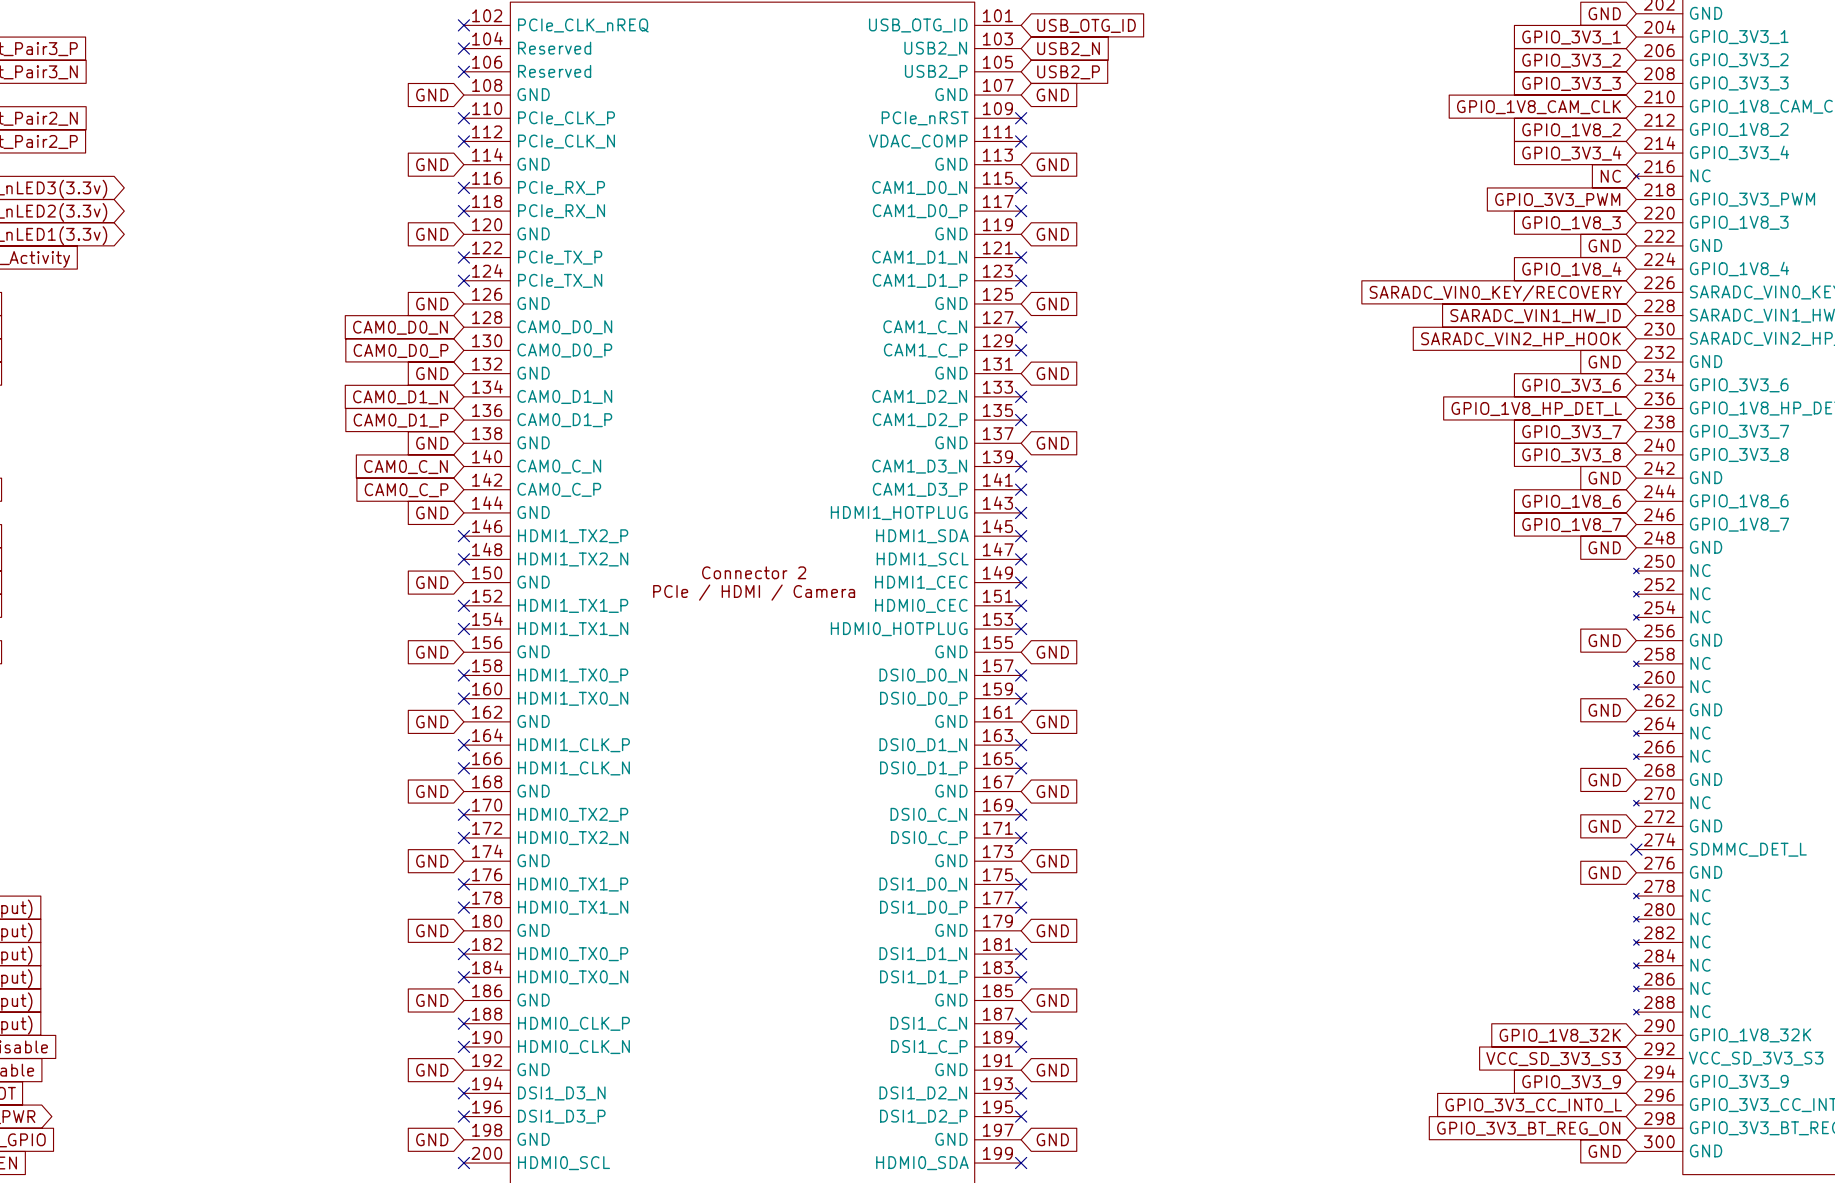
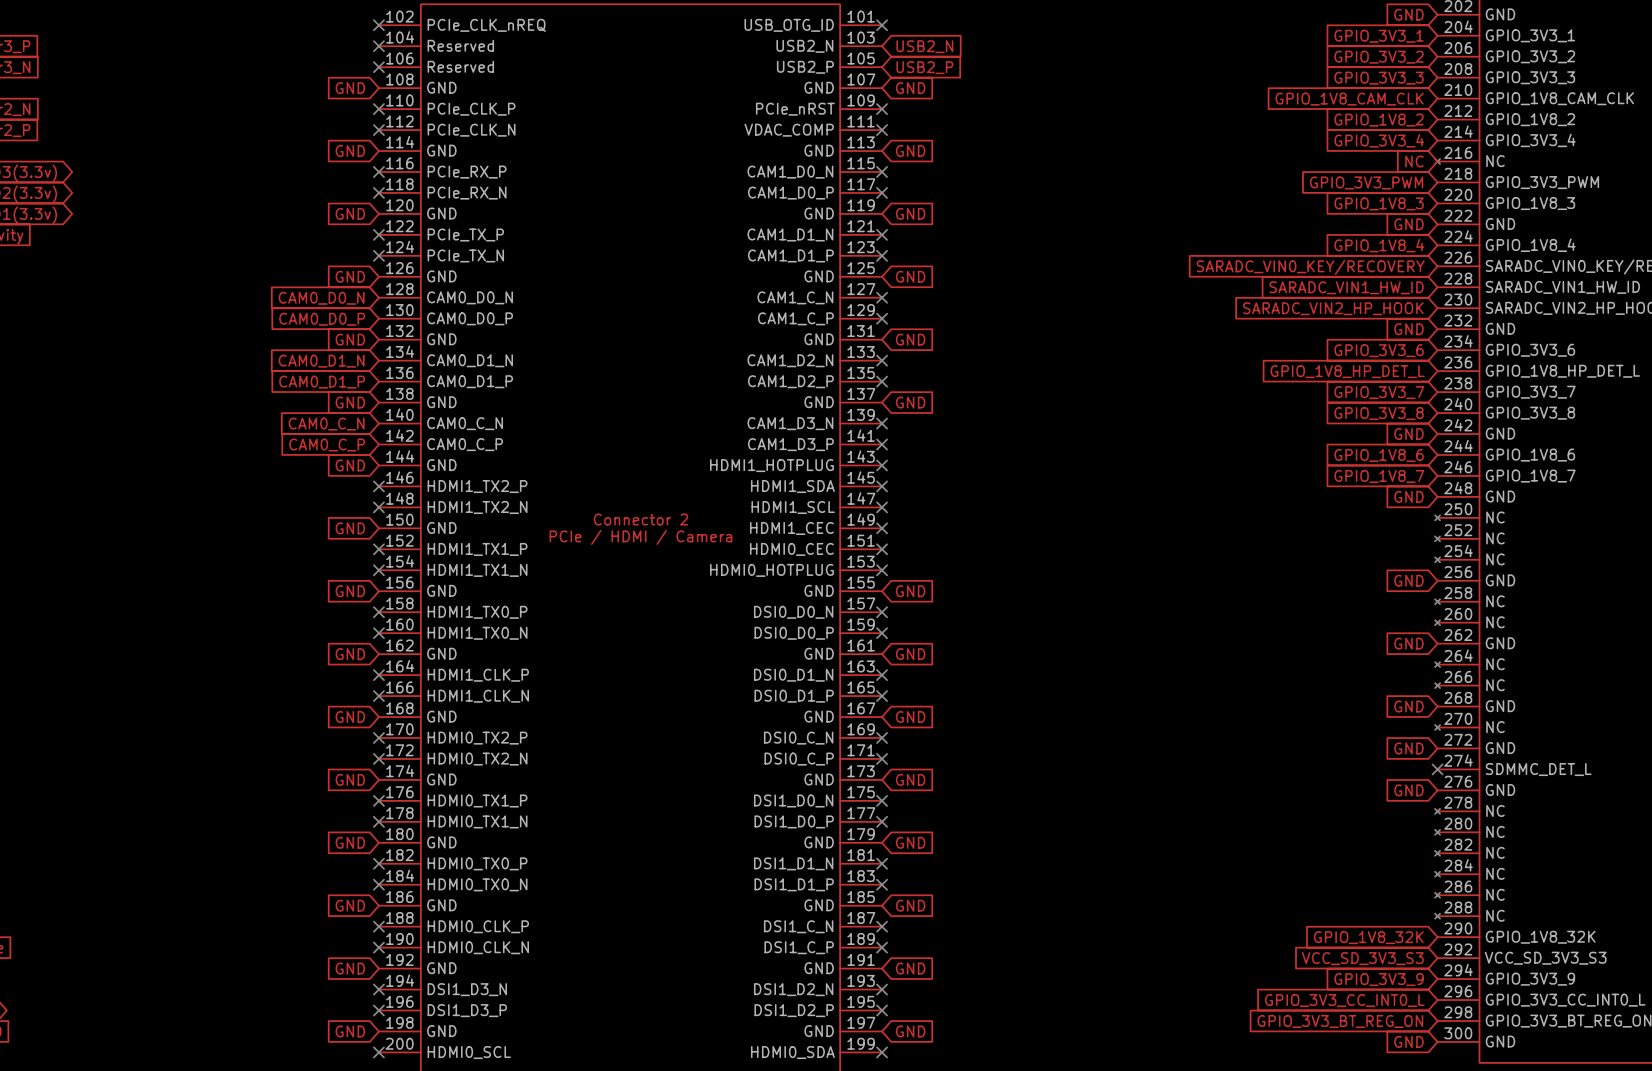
no-connect mark: none -> (882, 25)
global label: USB_OTG_ID (1086, 25) -> none

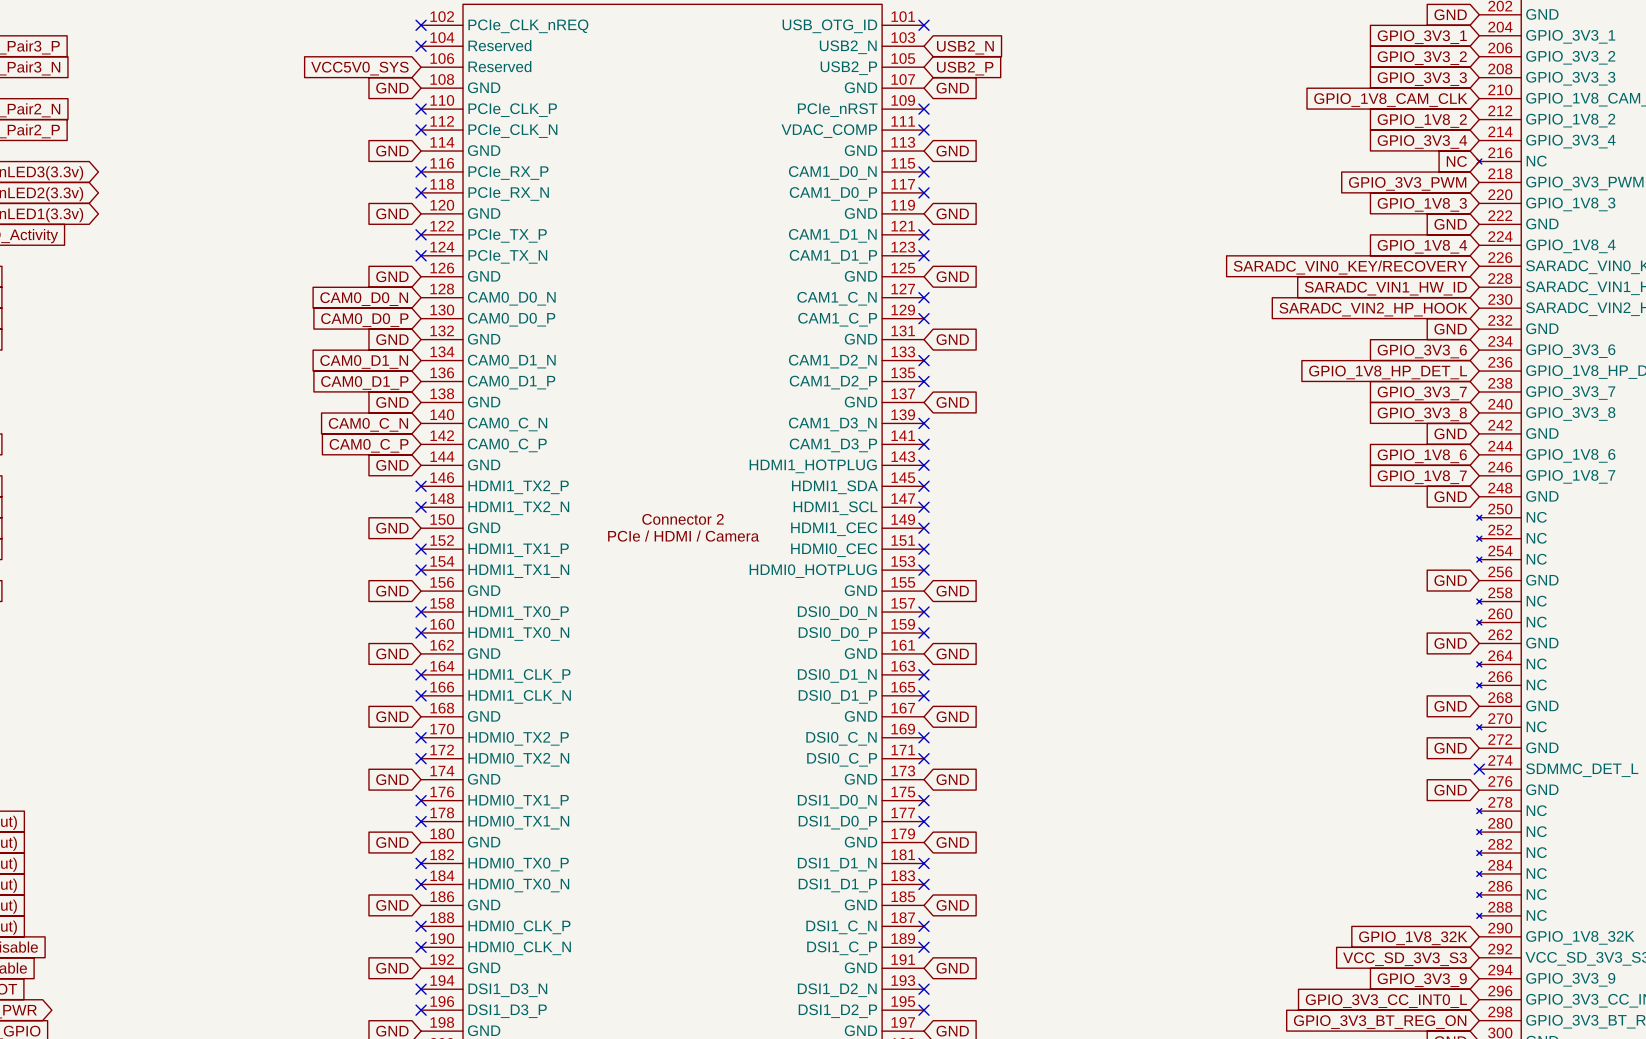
global label: none -> VCC5V0_SYS (359, 68)
no-connect mark: (378, 67) -> none

